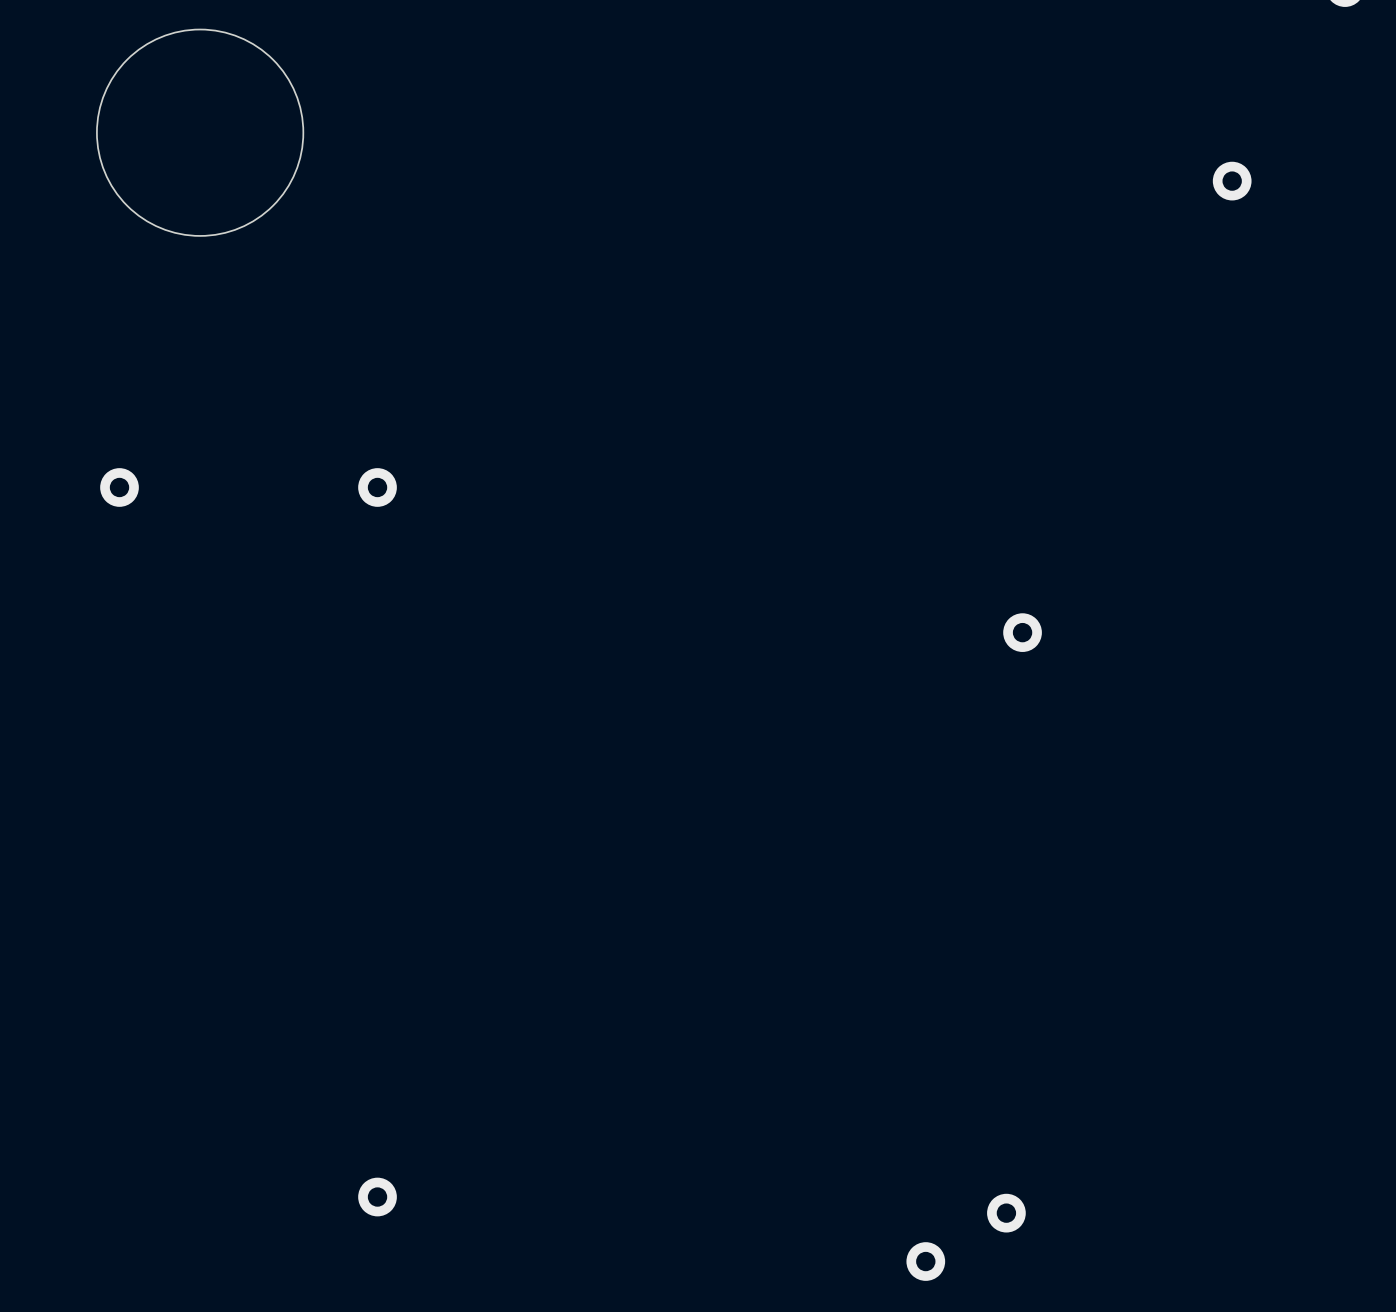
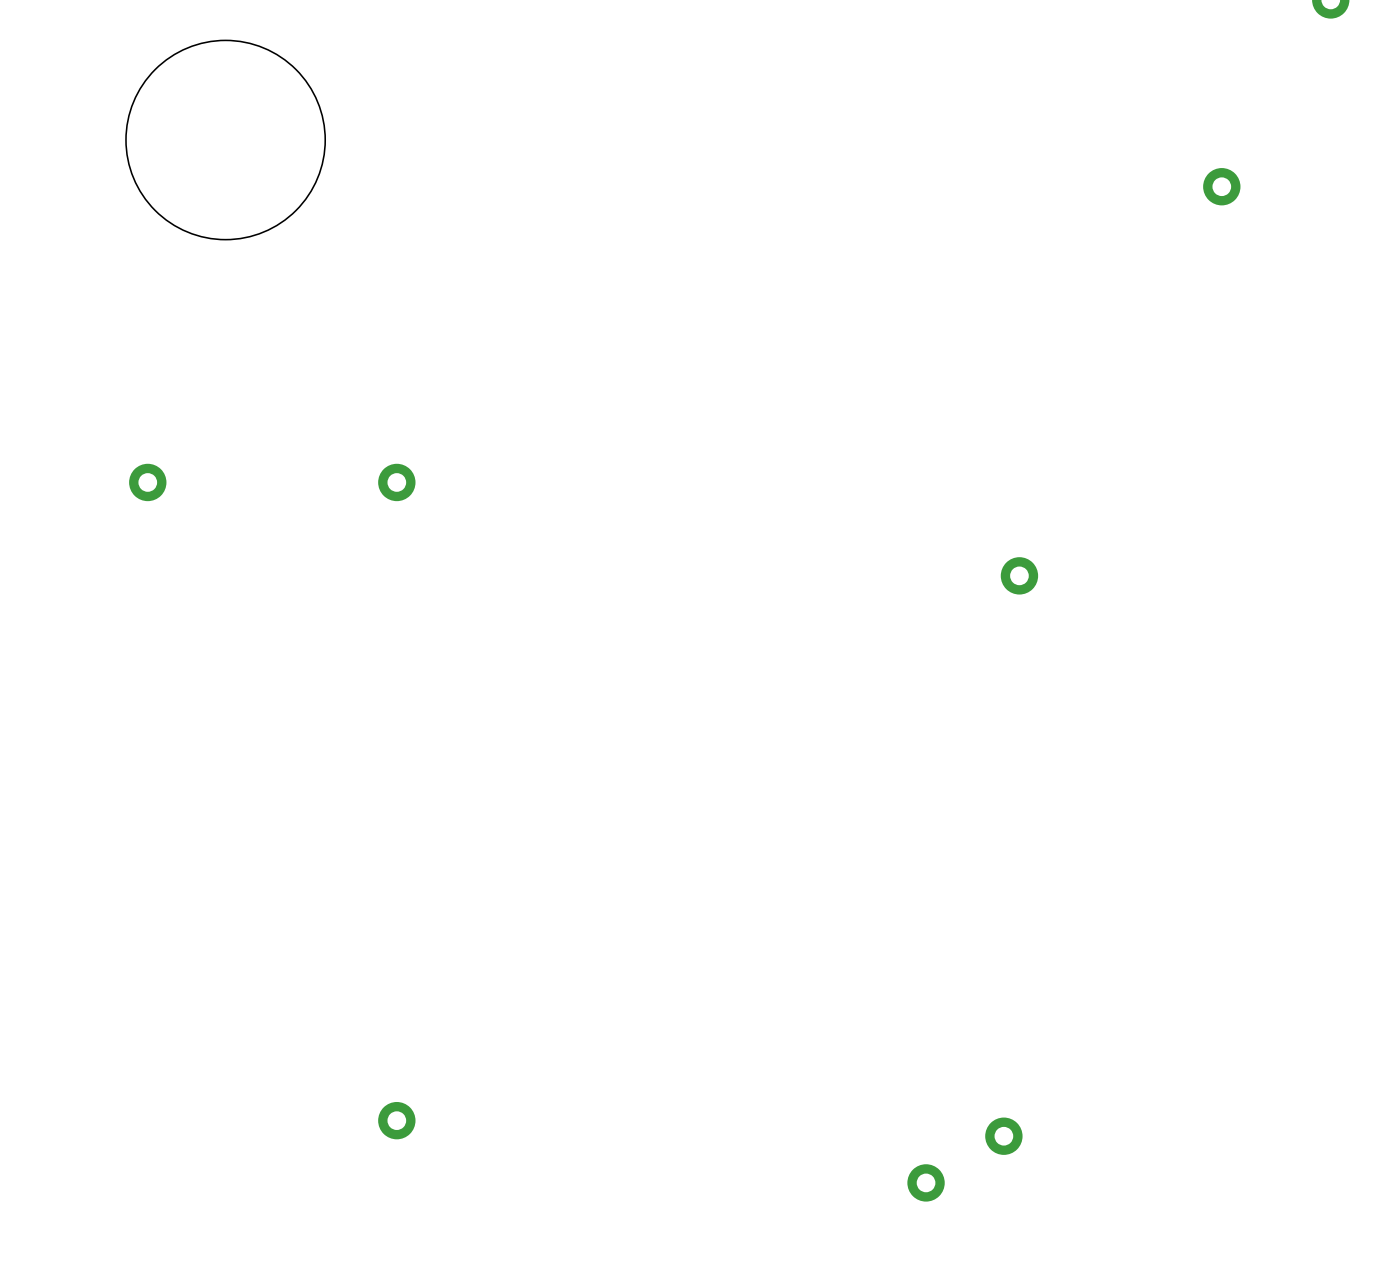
via position: (1022, 632) -> (1019, 575)
via: none -> (1003, 1136)
via position: (377, 1197) -> (396, 1120)
via: none -> (926, 1182)
via: (1006, 1213) -> none
via: (925, 1261) -> none

